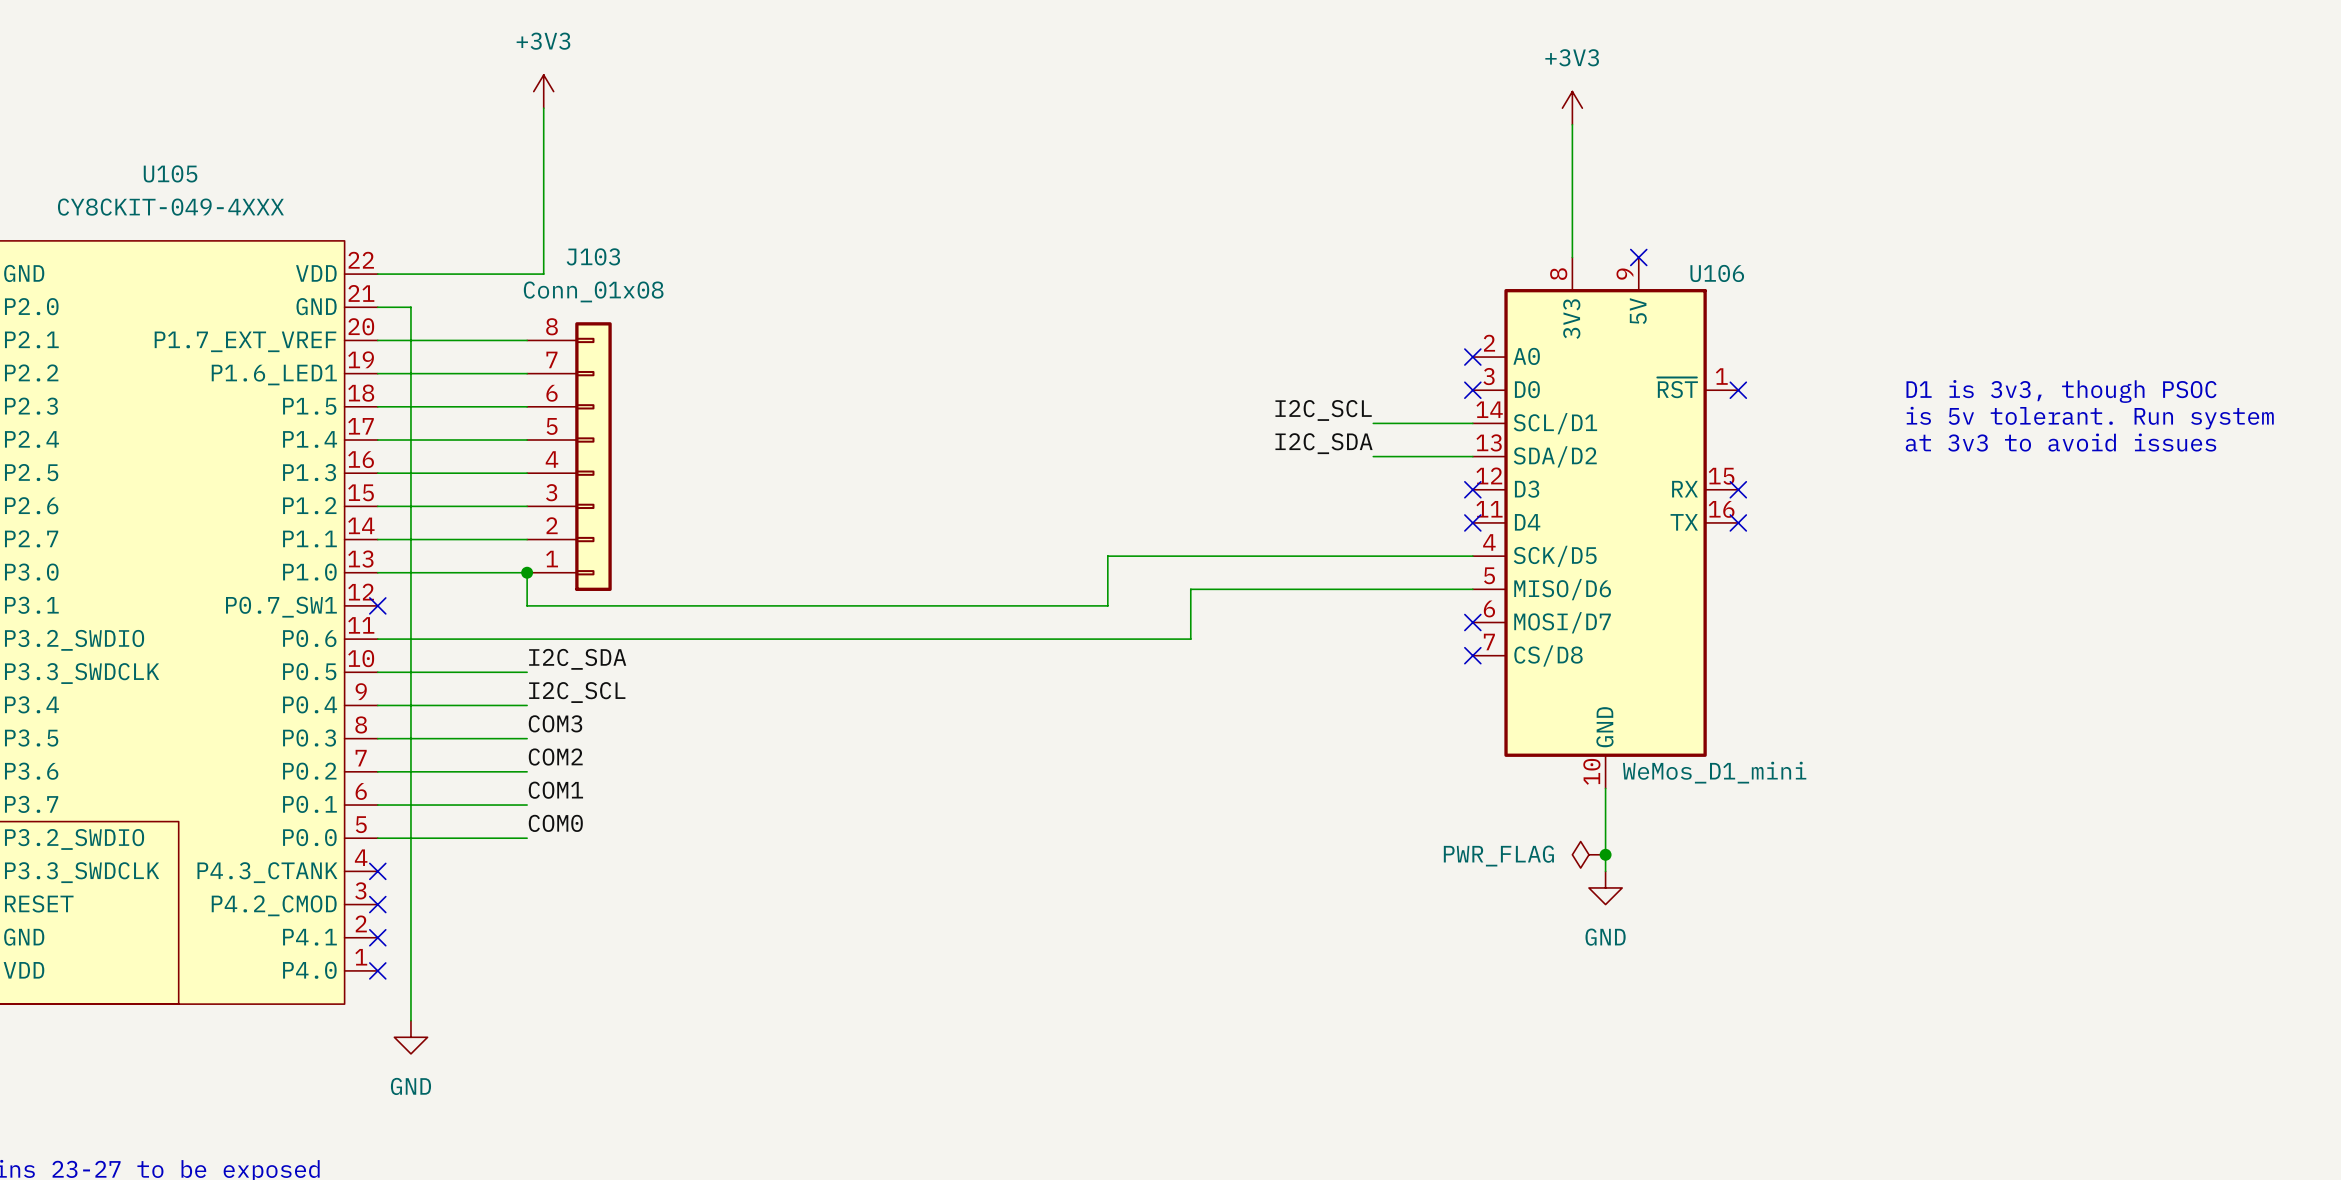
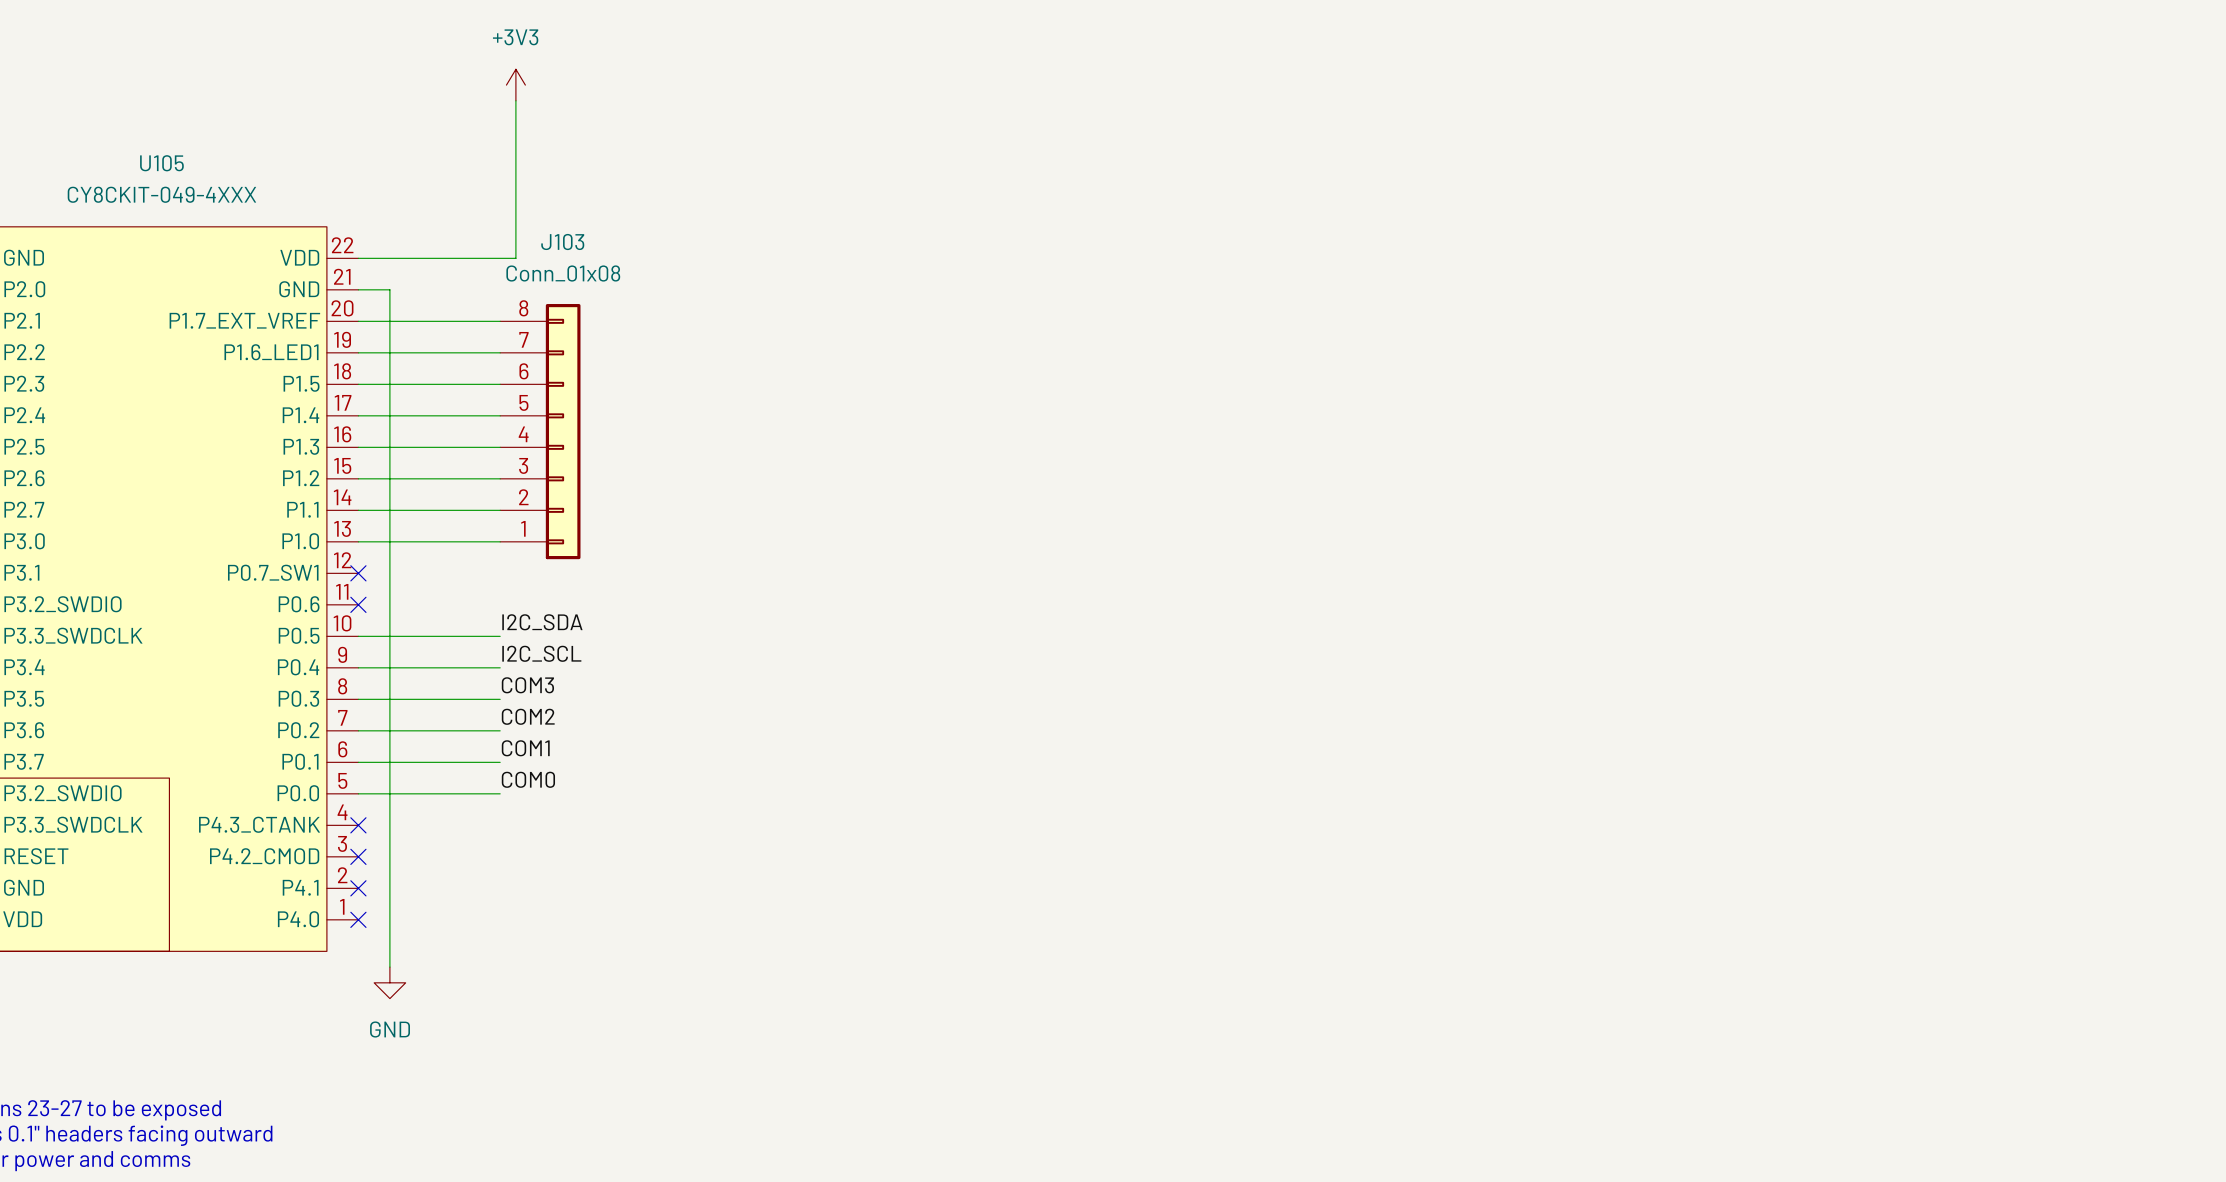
power symbol: +3V3 (1572, 108) -> none
wire: (1572, 124) (1572, 257) -> none
no-connect mark: (1638, 257) -> none
no-connect mark: (1472, 357) -> none
no-connect mark: (1472, 390) -> none
no-connect mark: (1738, 390) -> none
text: D1 is 3v3, though PSOC (2061, 391) -> none
label: I2C_SCL (1323, 410) -> none
text: is 5v tolerant. Run system (2090, 418) -> none
wire: (1373, 423) (1472, 423) -> none
text: at 3v3 to avoid issues (2060, 442) -> none
label: I2C_SDA (1324, 443) -> none
wire: (1373, 456) (1472, 456) -> none
no-connect mark: (1472, 489) -> none
no-connect mark: (1738, 489) -> none
no-connect mark: (1472, 522) -> none
U106: WeMos_D1_mini (1605, 522) -> none
no-connect mark: (1738, 522) -> none
wire: (1472, 556) (1107, 556) (1107, 605) (527, 605) (527, 572) -> none
junction: (527, 572) -> none
wire: (1472, 589) (1190, 589) (1190, 639) (377, 639) -> none
no-connect mark: (1472, 622) -> none
no-connect mark: none -> (358, 604)
no-connect mark: (1472, 655) -> none
wire: (1605, 788) (1605, 871) -> none
power symbol: PWR_FLAG (1588, 854) -> none
junction: (1605, 854) -> none
power symbol: GND (1605, 887) -> none

